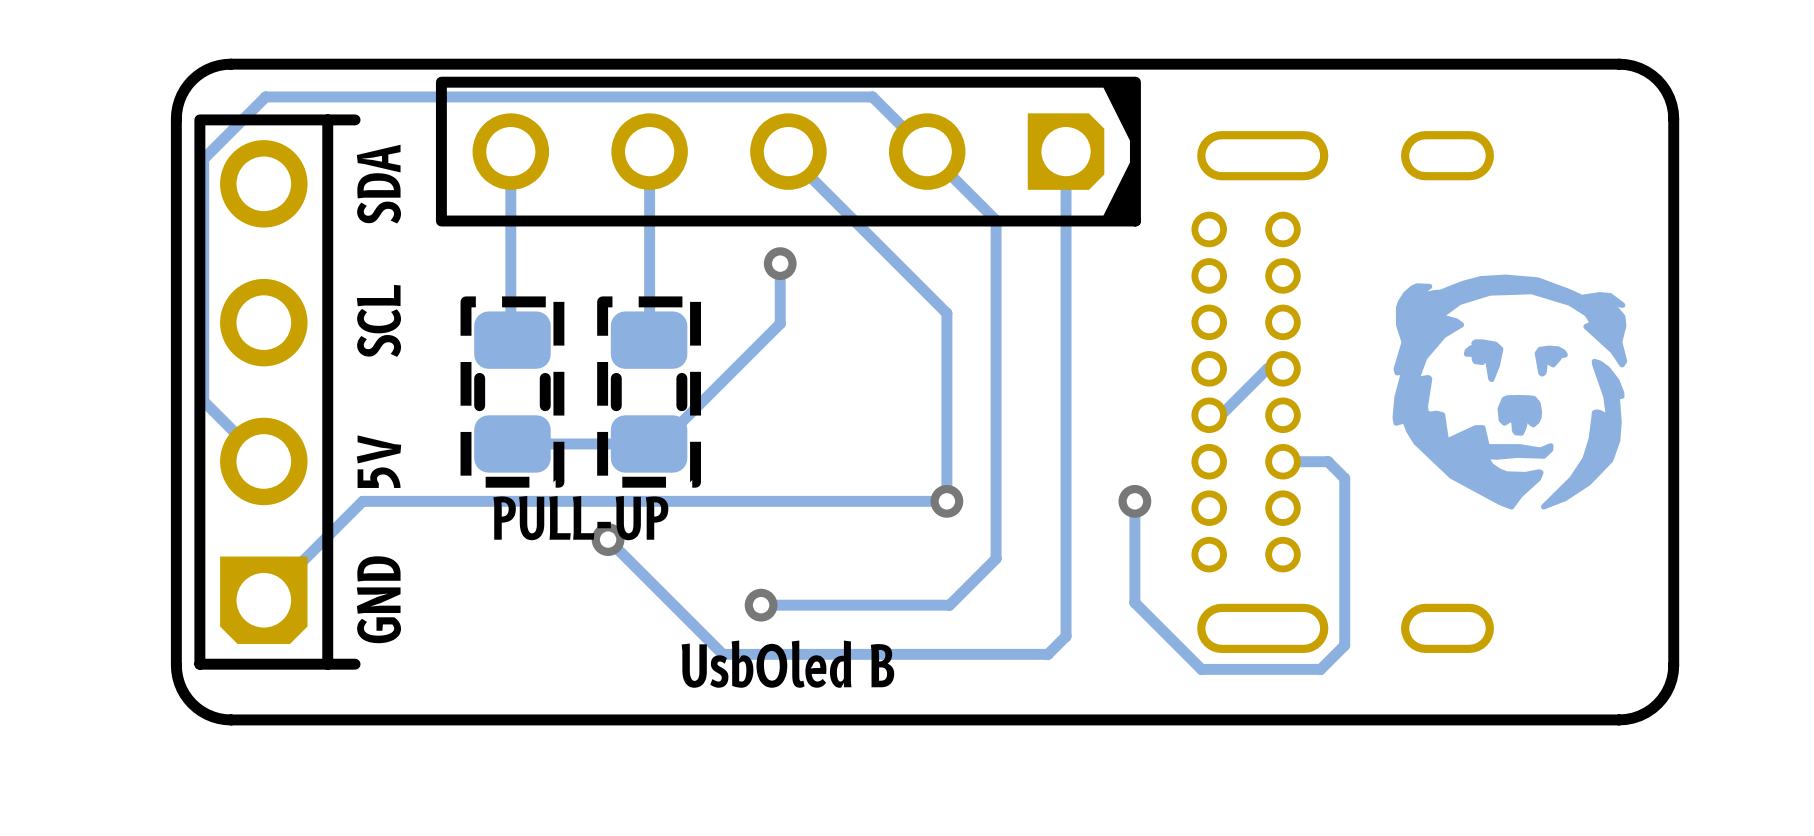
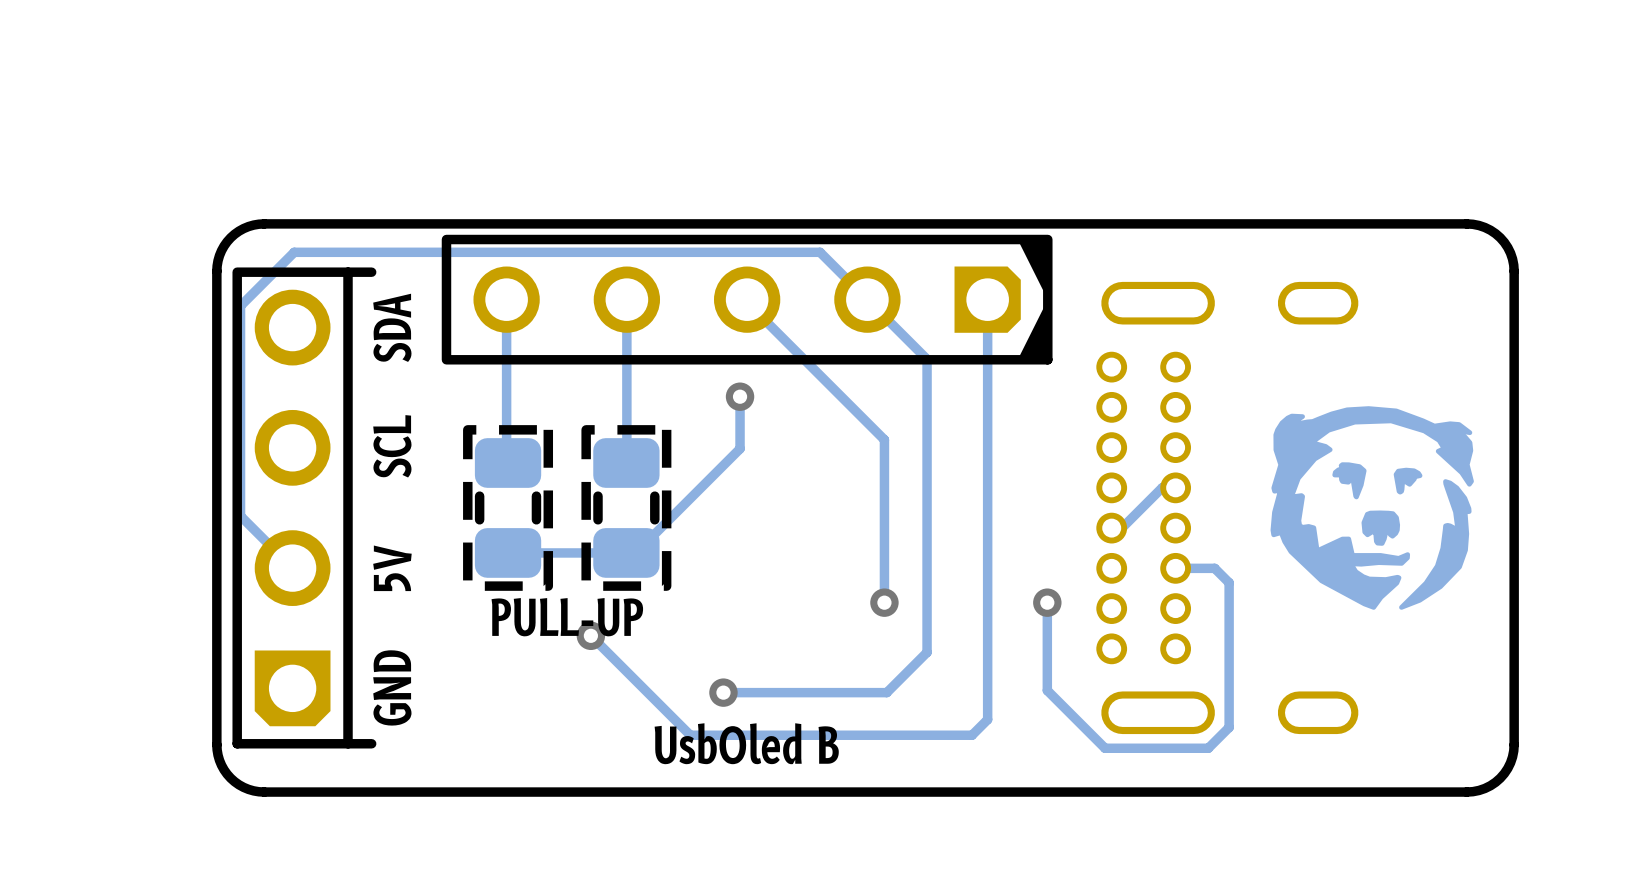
track: (946, 501) (362, 501) (263, 600) -> none

